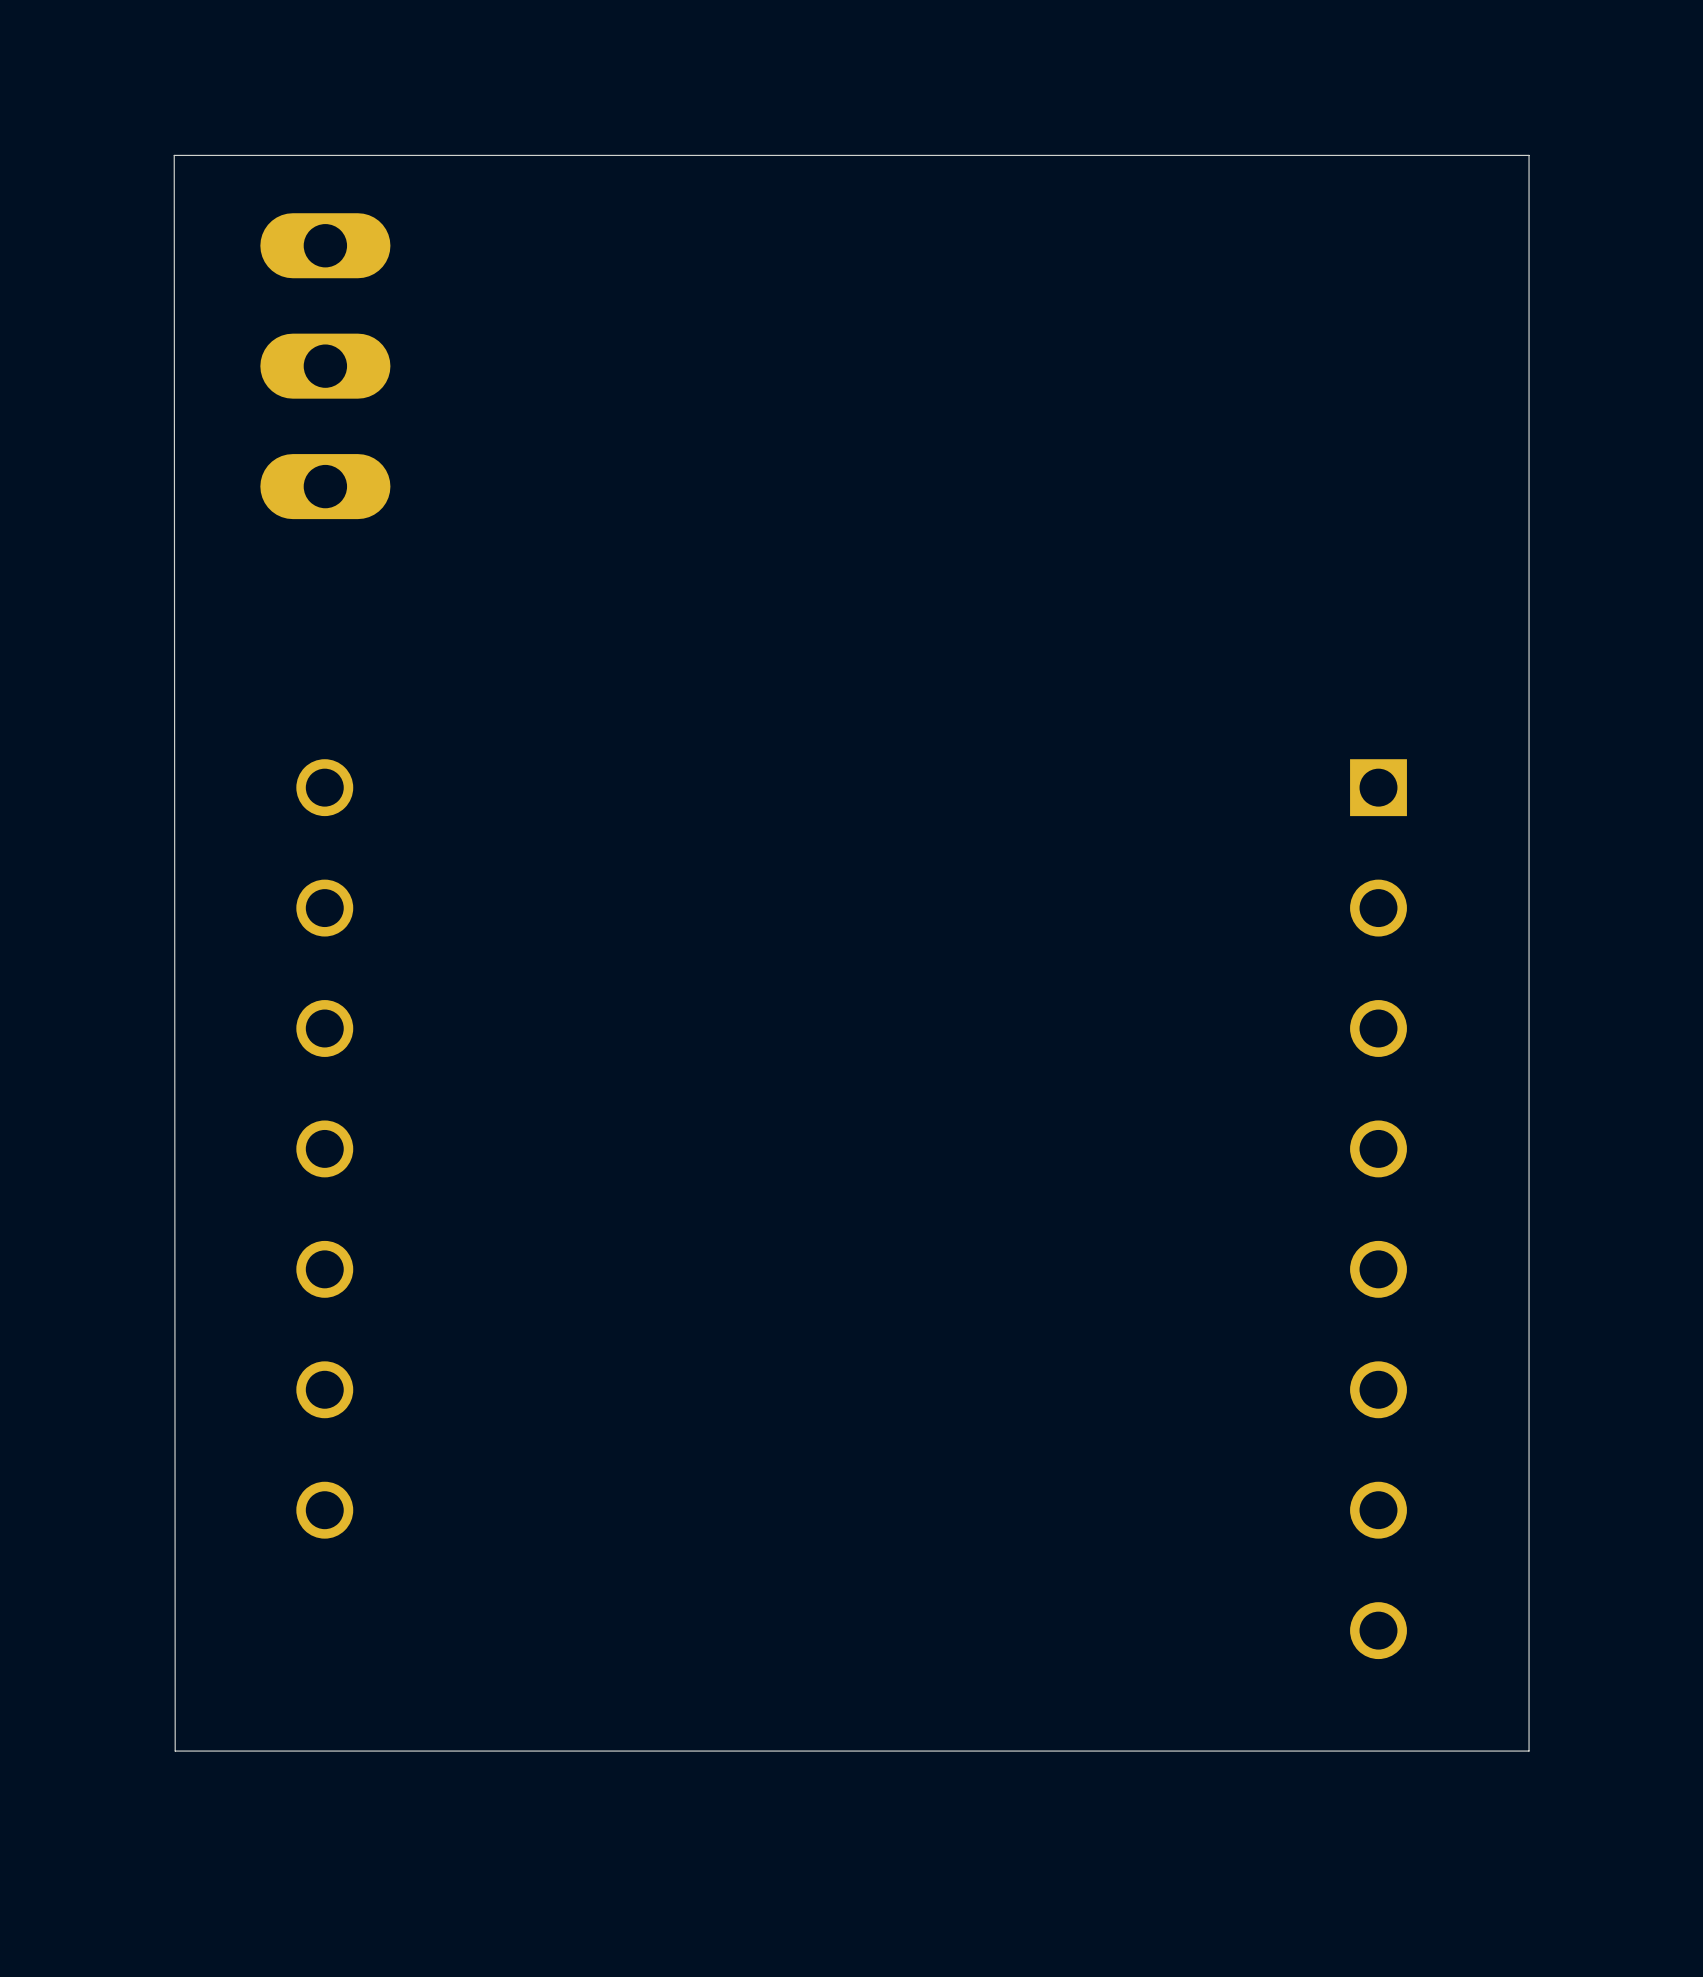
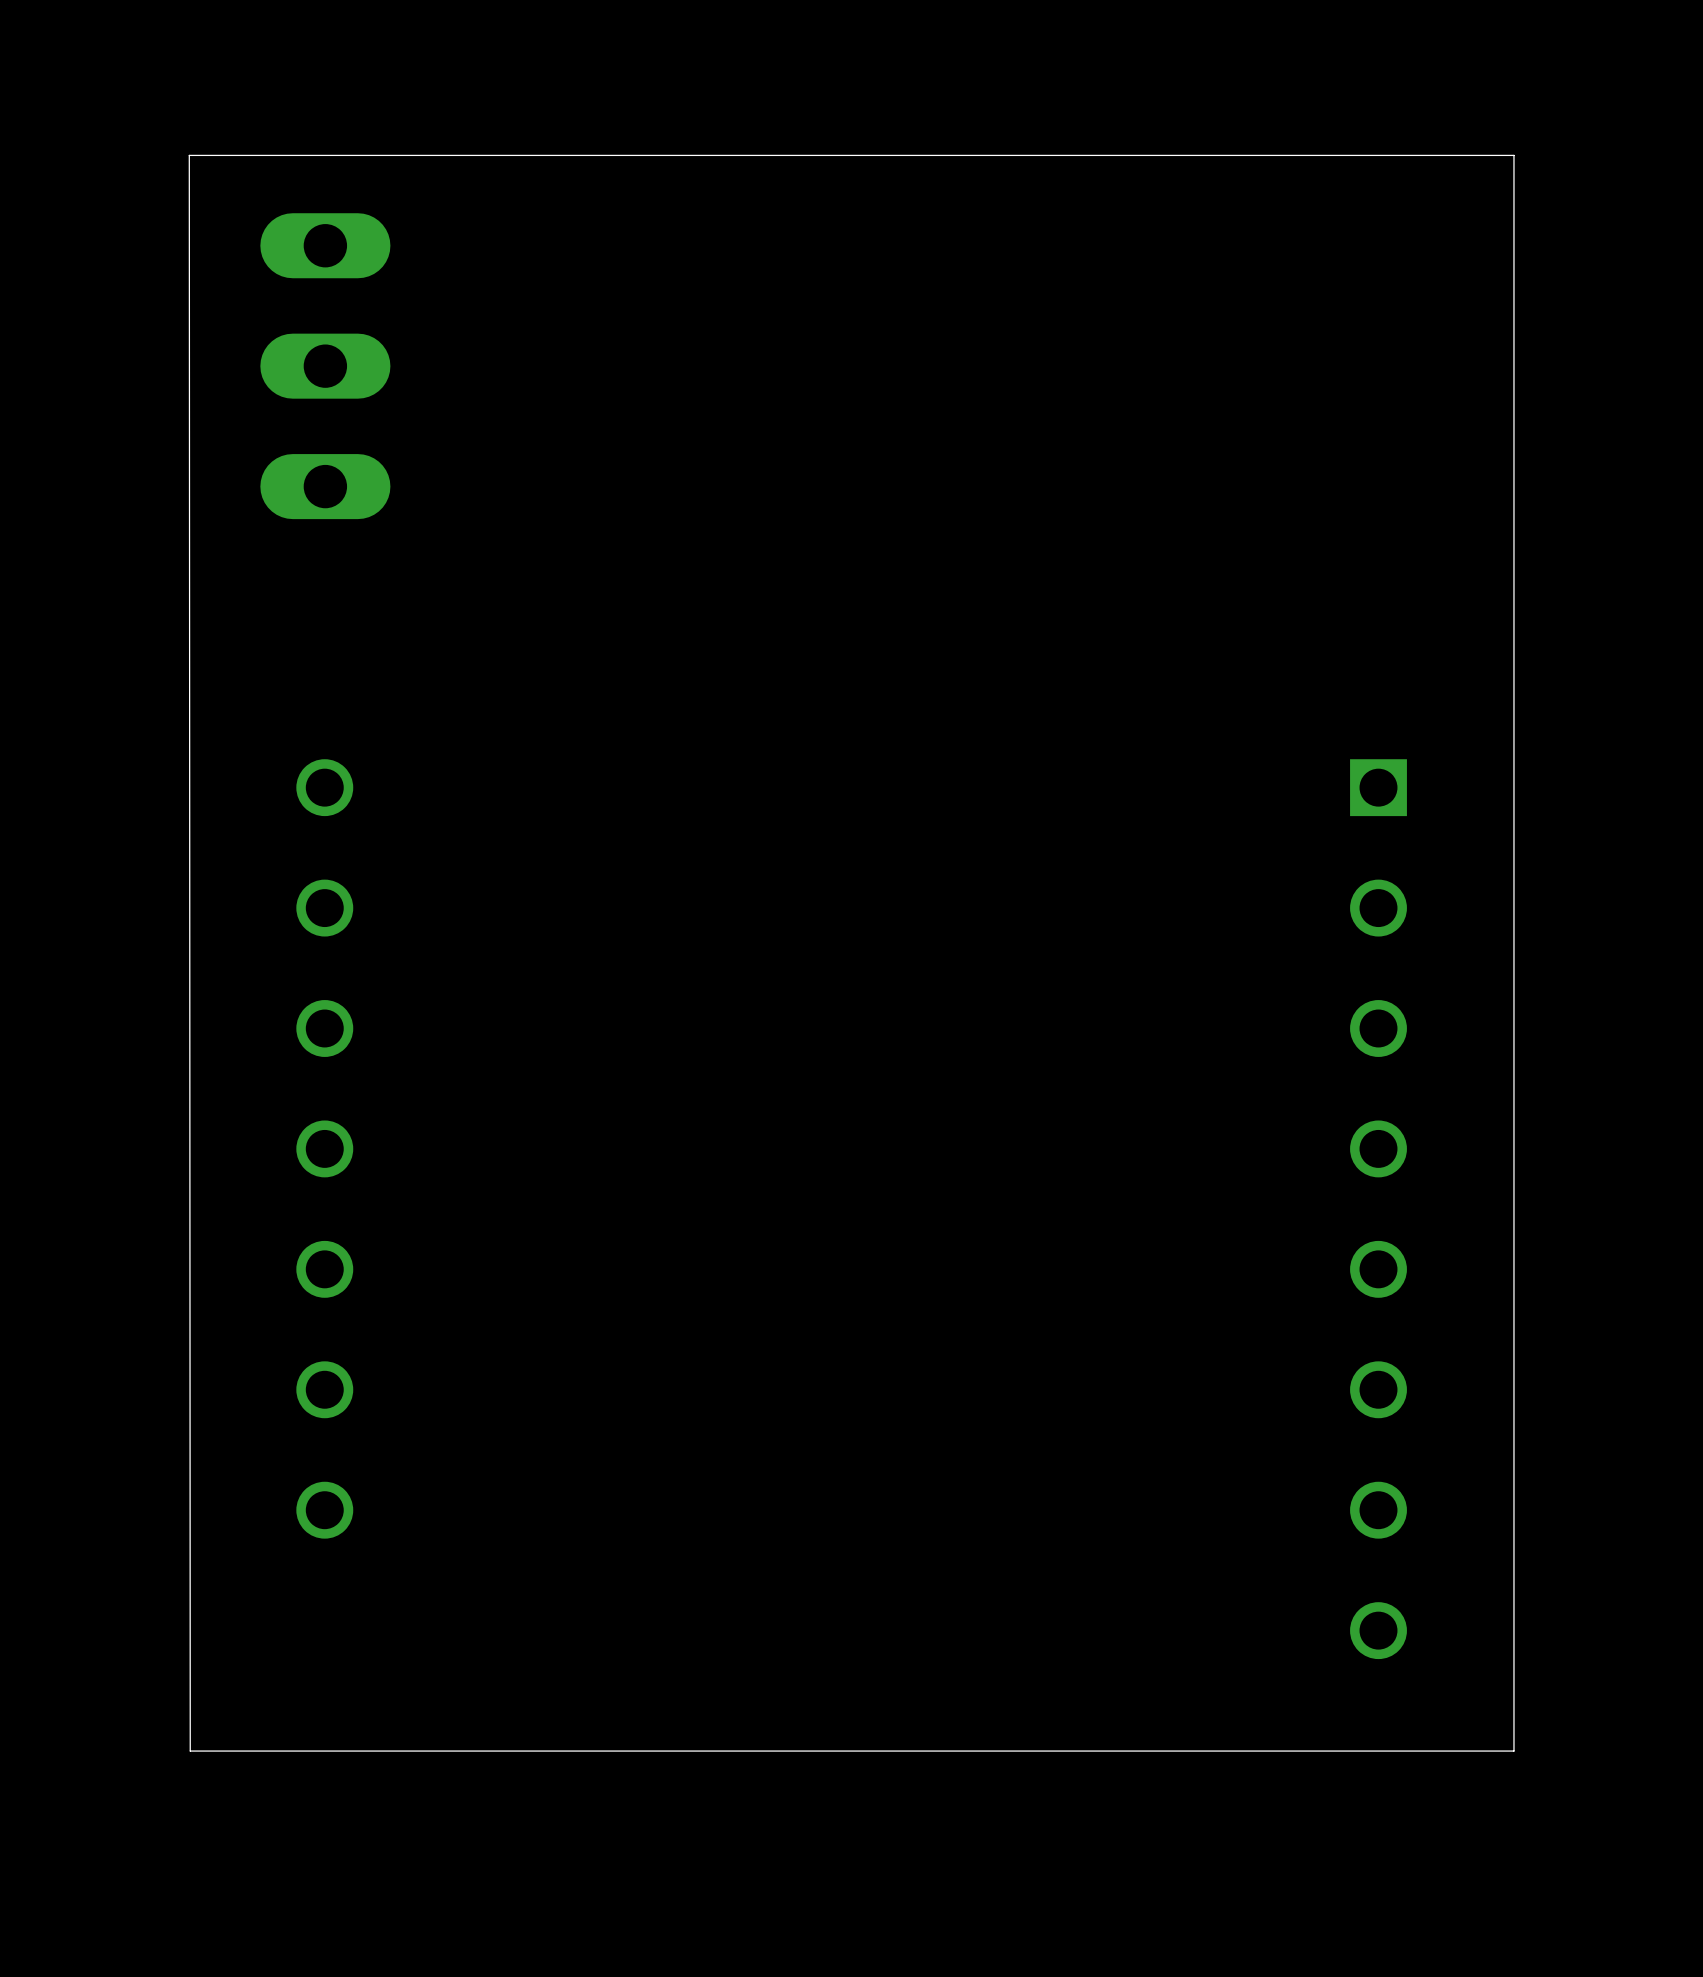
board edge: (189, 155) (174, 155) (175, 1751) (190, 1751) -> (189, 155) (190, 1751)
board edge: (1513, 155) (1529, 155) (1529, 1751) (1513, 1751) -> (1513, 155) (1513, 1751)

